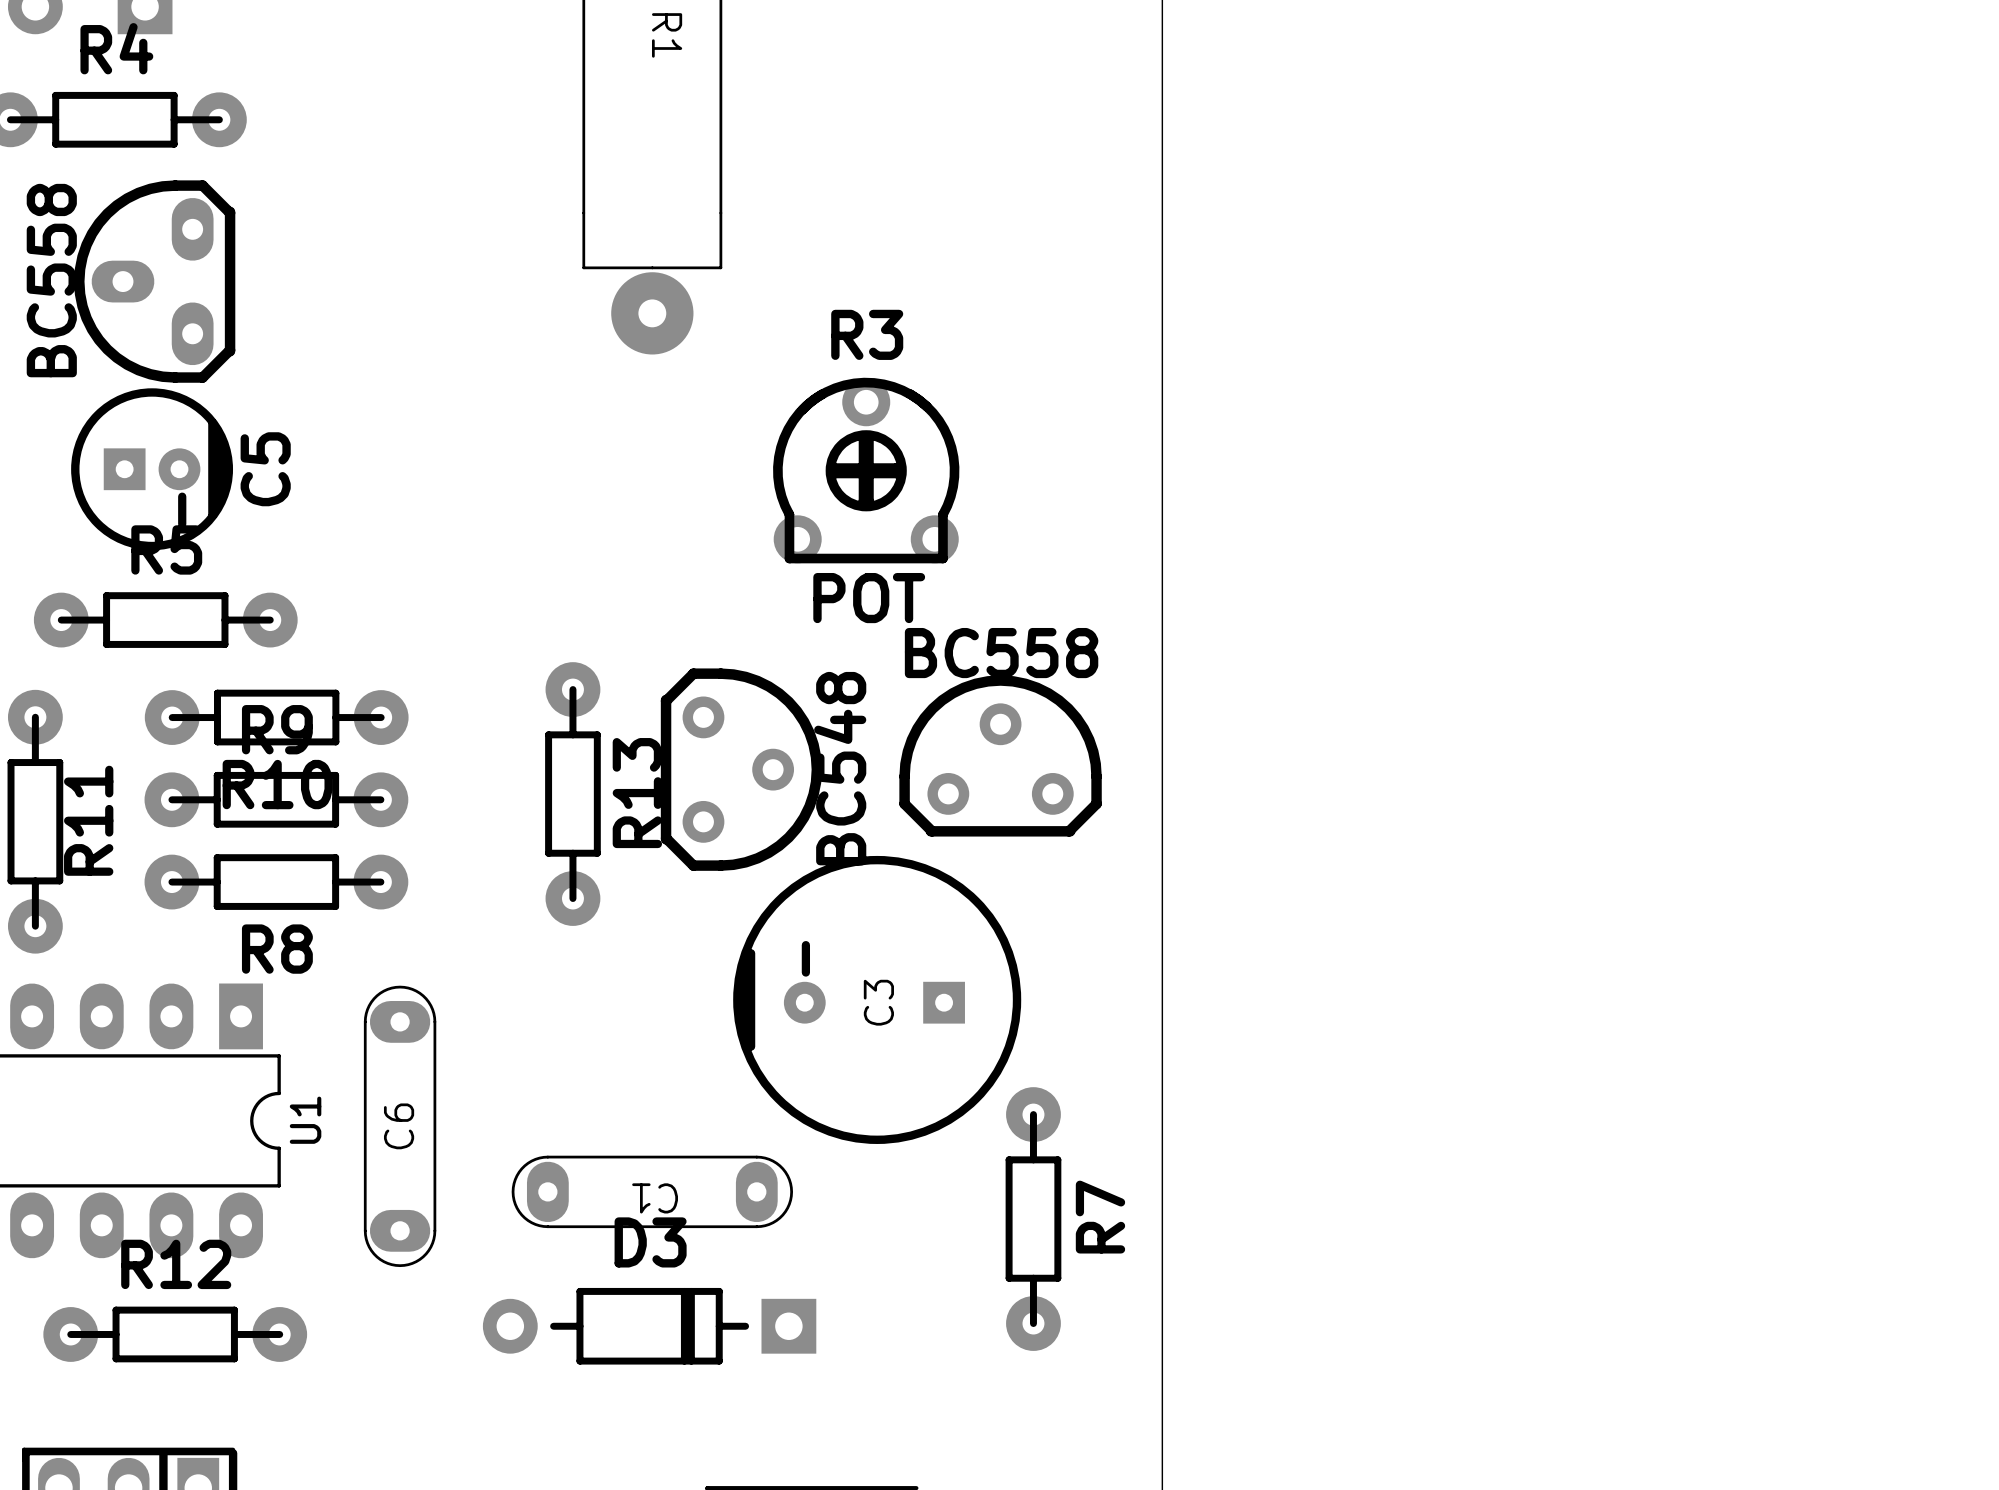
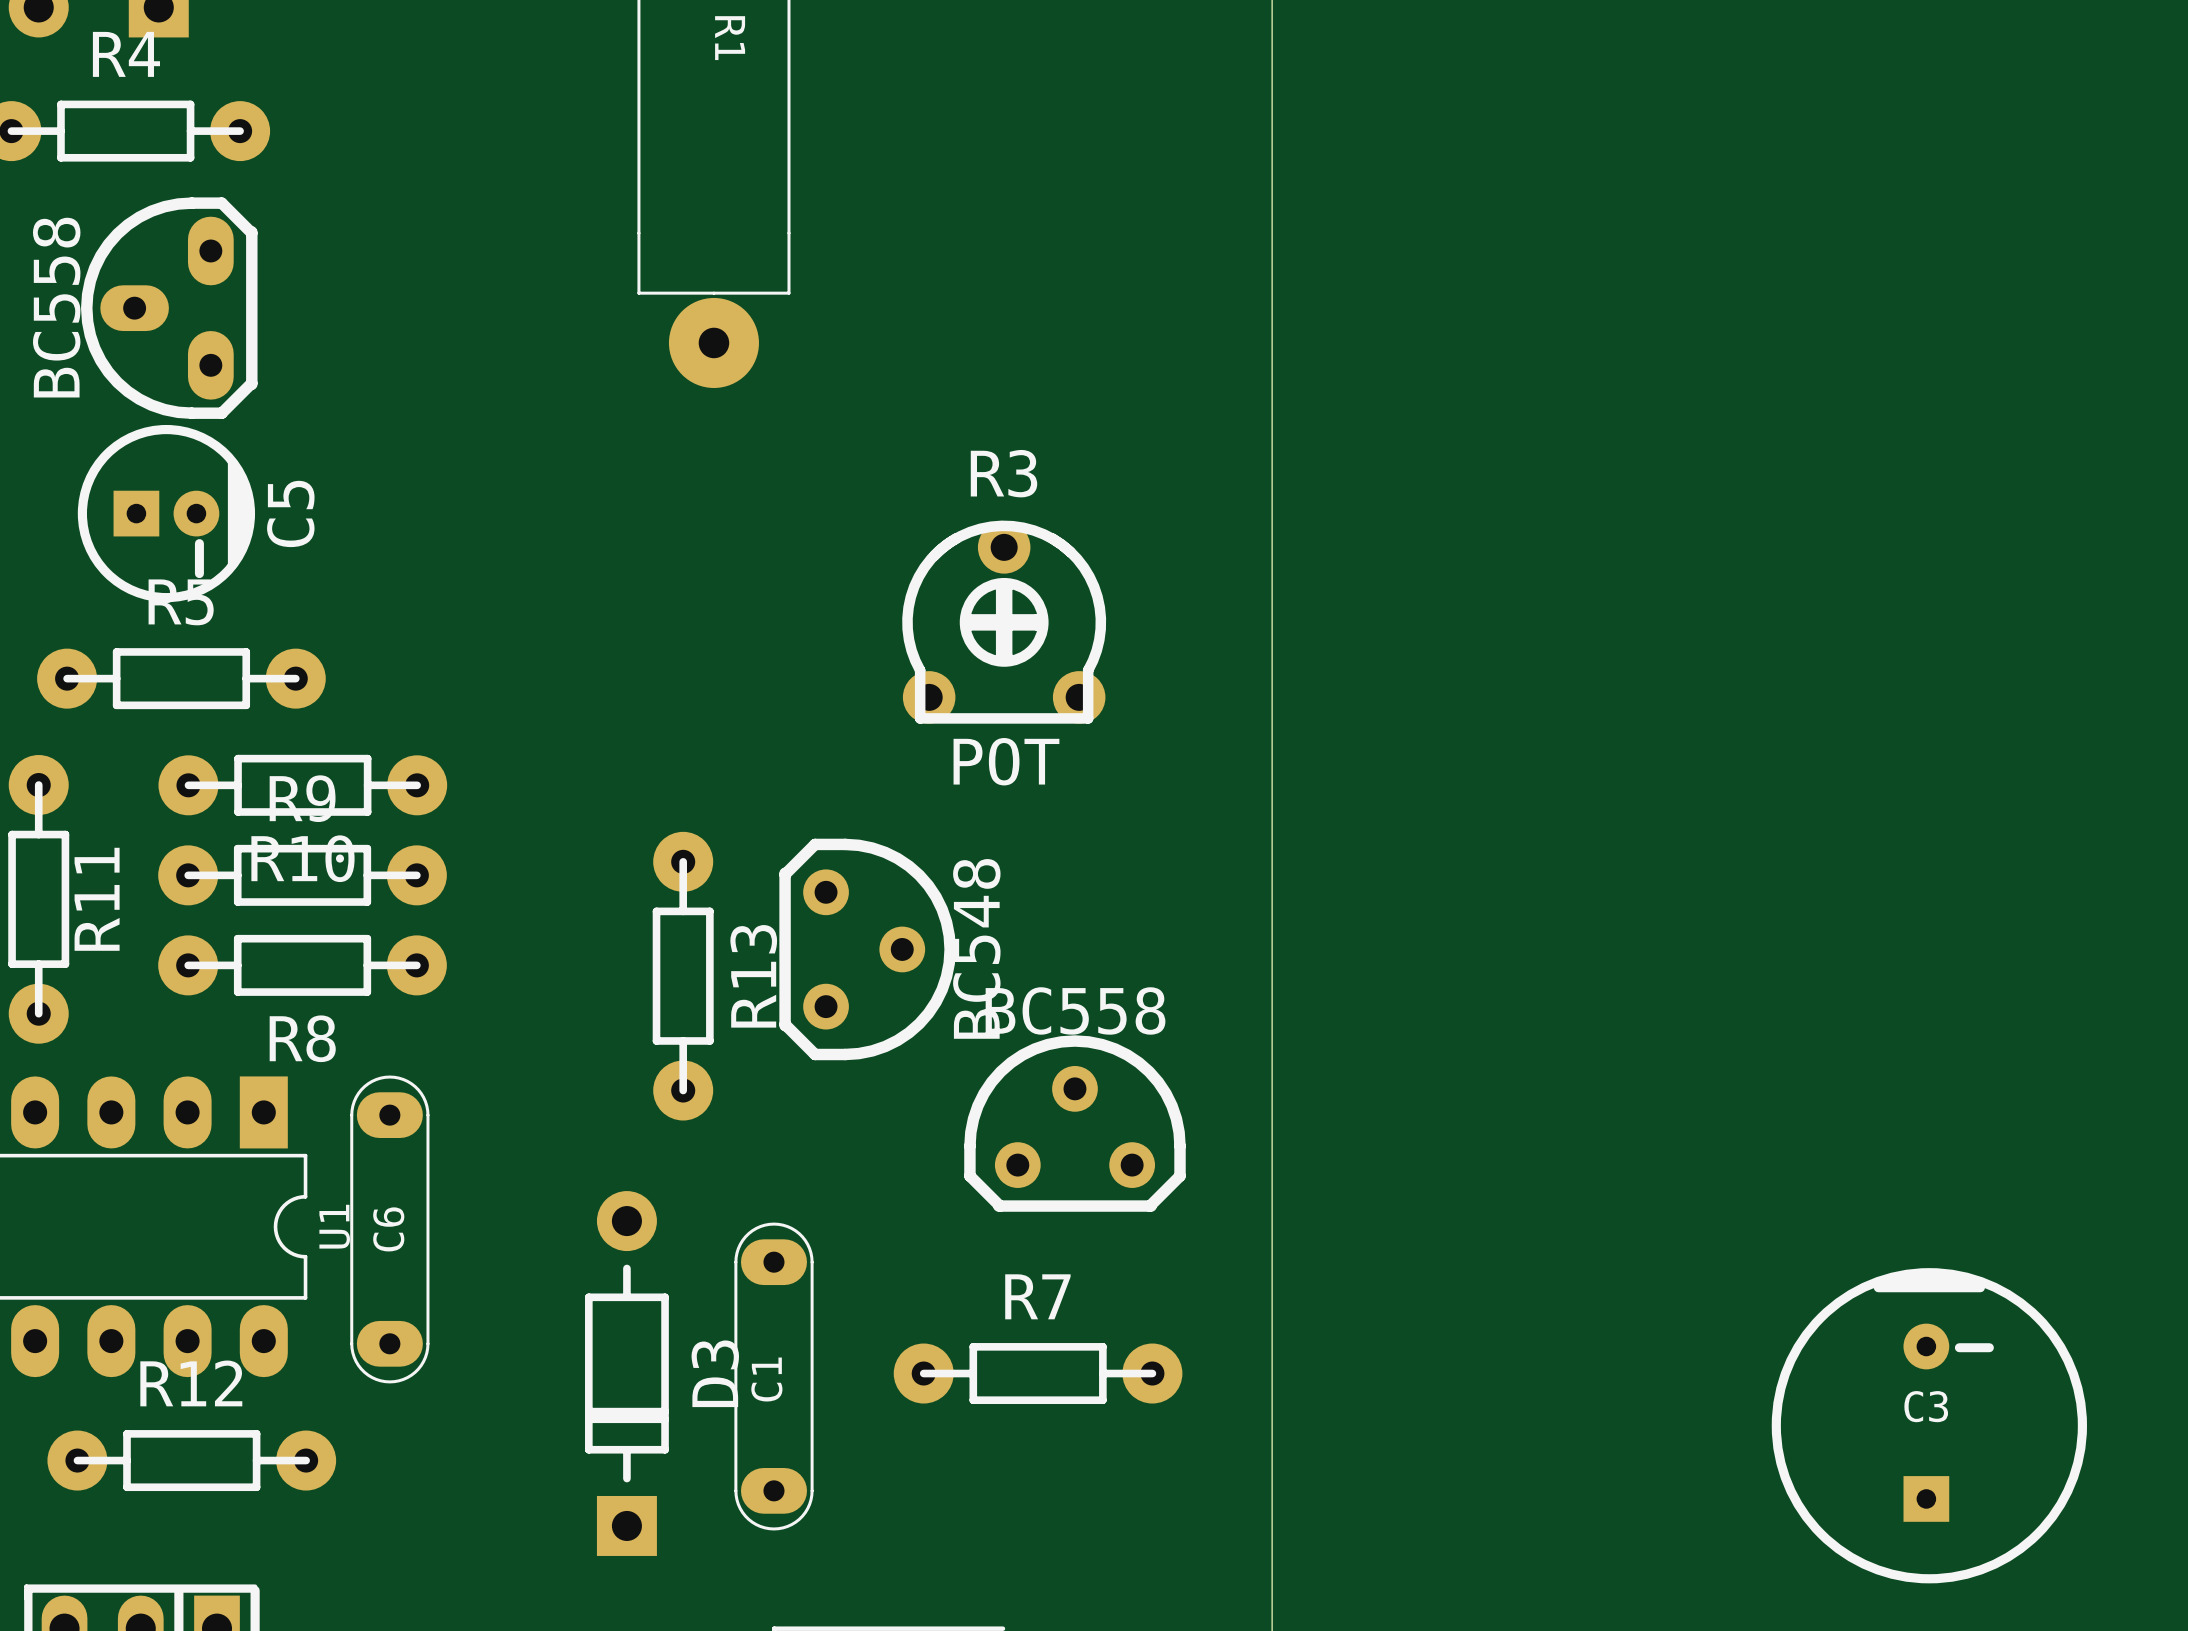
R3 position: (866, 470) -> (1004, 622)
part position: (1000, 755) -> (1074, 1123)
part position: (741, 769) -> (867, 949)
R13 position: (572, 794) -> (683, 976)
C3 rotation: 0° (877, 999) -> 90° clockwise (1929, 1425)
C3 position: (877, 999) -> (1929, 1425)
C6 position: (400, 1126) -> (389, 1229)
C1 rotation: 0° (652, 1191) -> 90° clockwise (773, 1376)
R7 name position: R7 (1100, 1217) -> R7 (1037, 1296)
R7 rotation: 0° (1033, 1219) -> 90° clockwise (1038, 1373)
D3 rotation: 0° (649, 1326) -> 90° clockwise (626, 1373)

